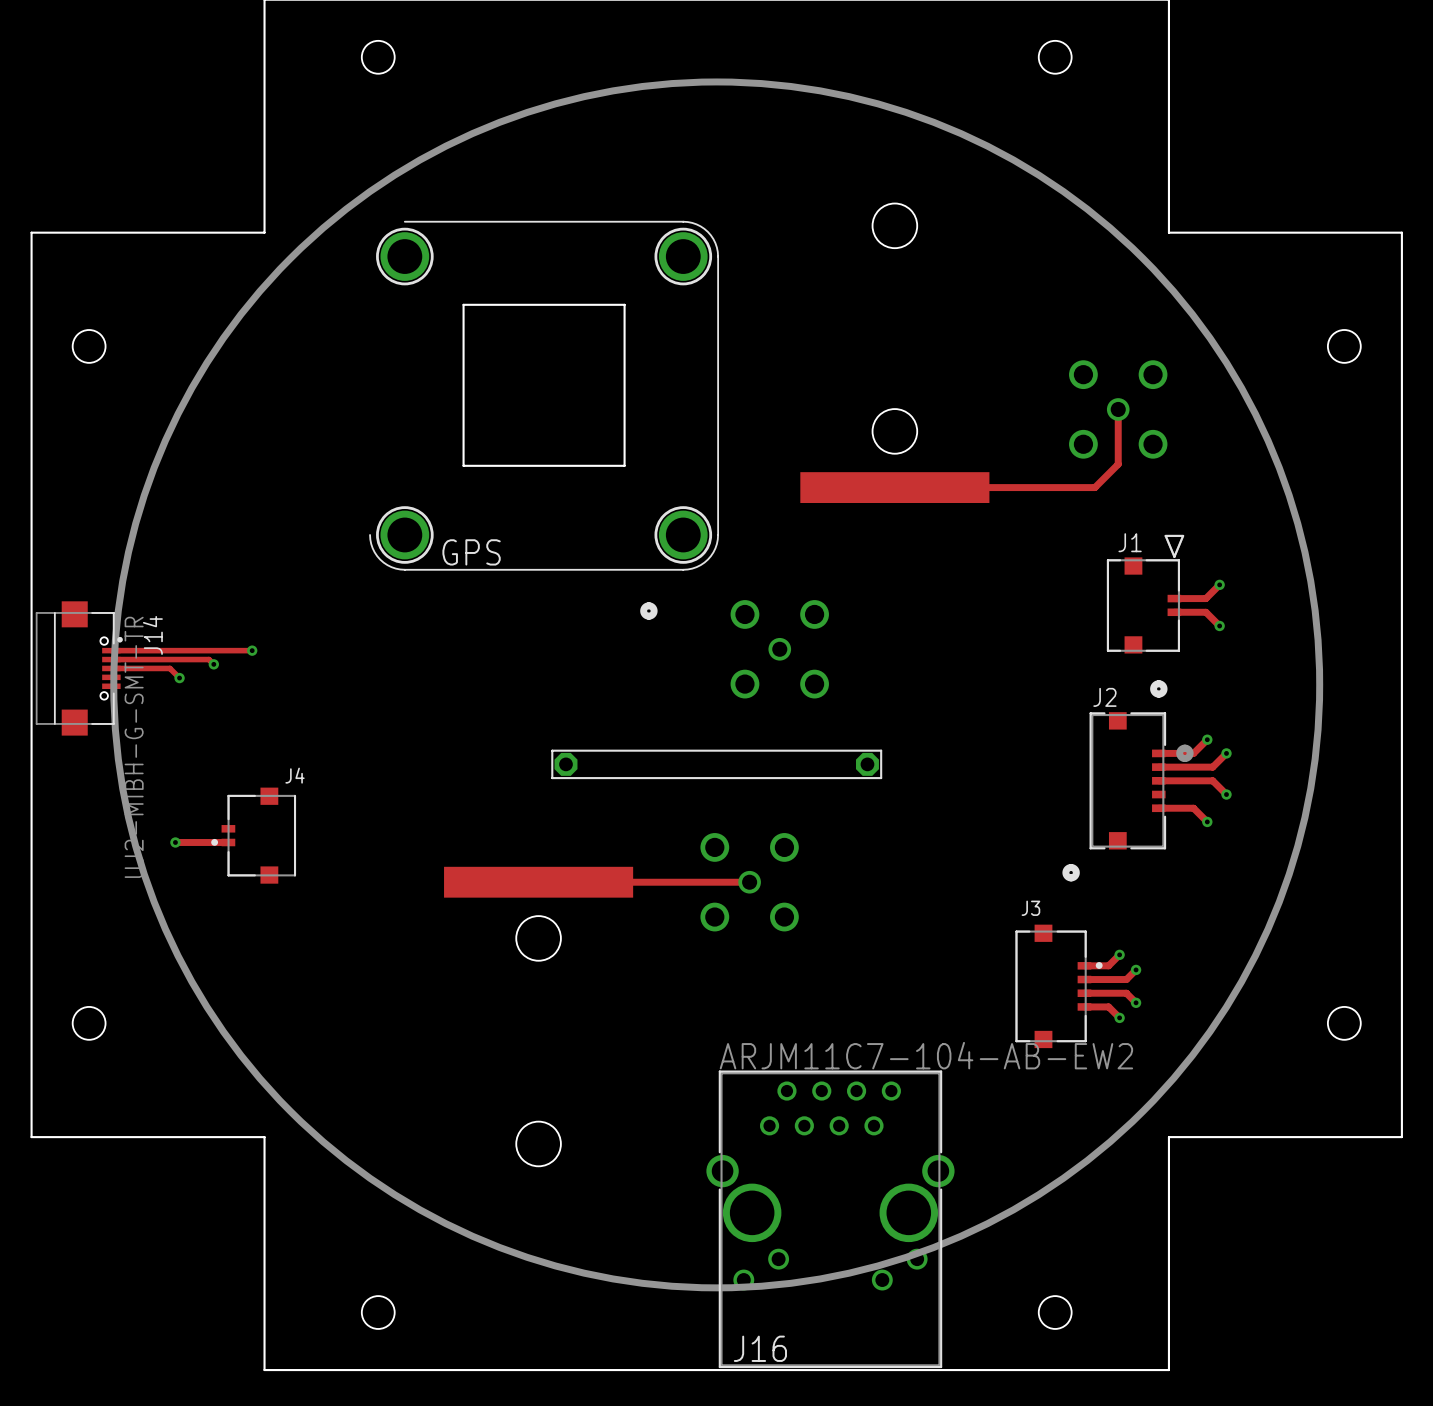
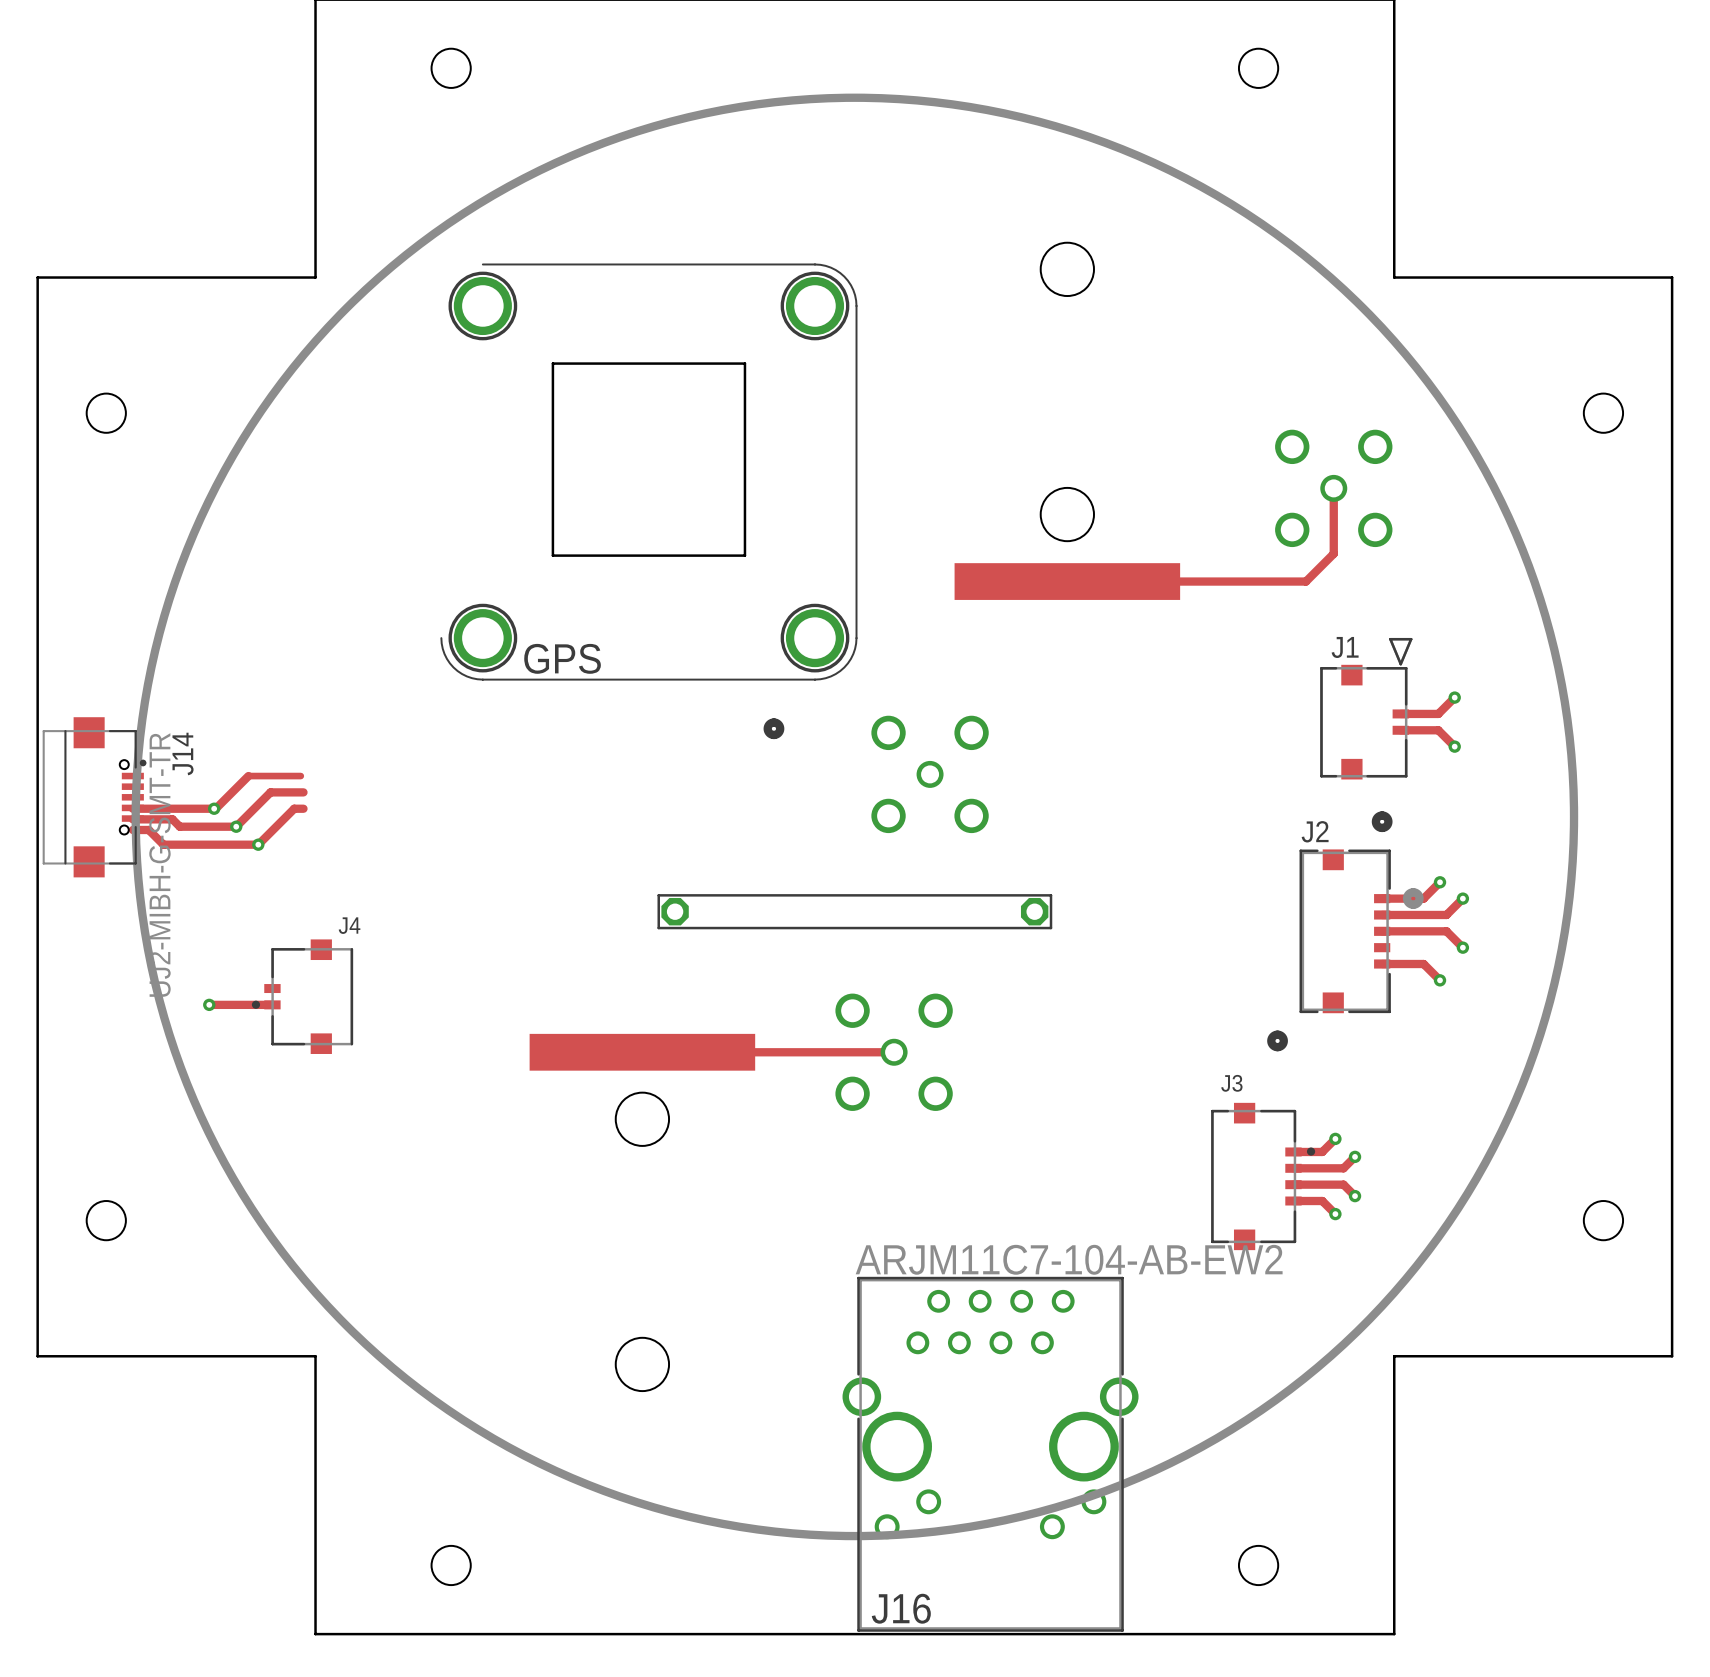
track: (111, 650) (208, 650) -> (132, 808) (215, 808) (248, 776)
via: (252, 650) -> none
track: (111, 659) (209, 659) (213, 664) -> none
via: (213, 664) -> none
track: none -> (303, 792) (270, 792) (236, 826) (179, 826) (172, 819) (132, 819)
track: (111, 668) (169, 668) (179, 678) -> none
track: none -> (303, 808) (294, 808) (258, 844) (163, 844) (148, 829) (132, 829)
via: none -> (236, 826)
via: none -> (258, 844)

